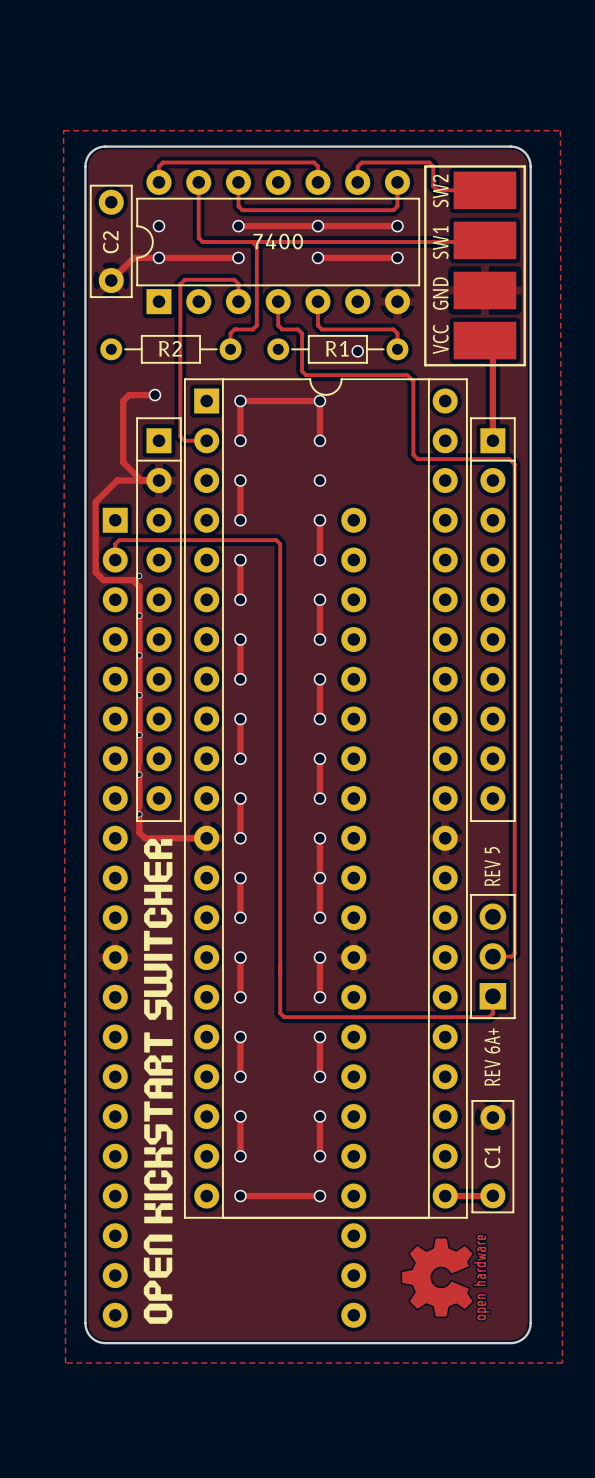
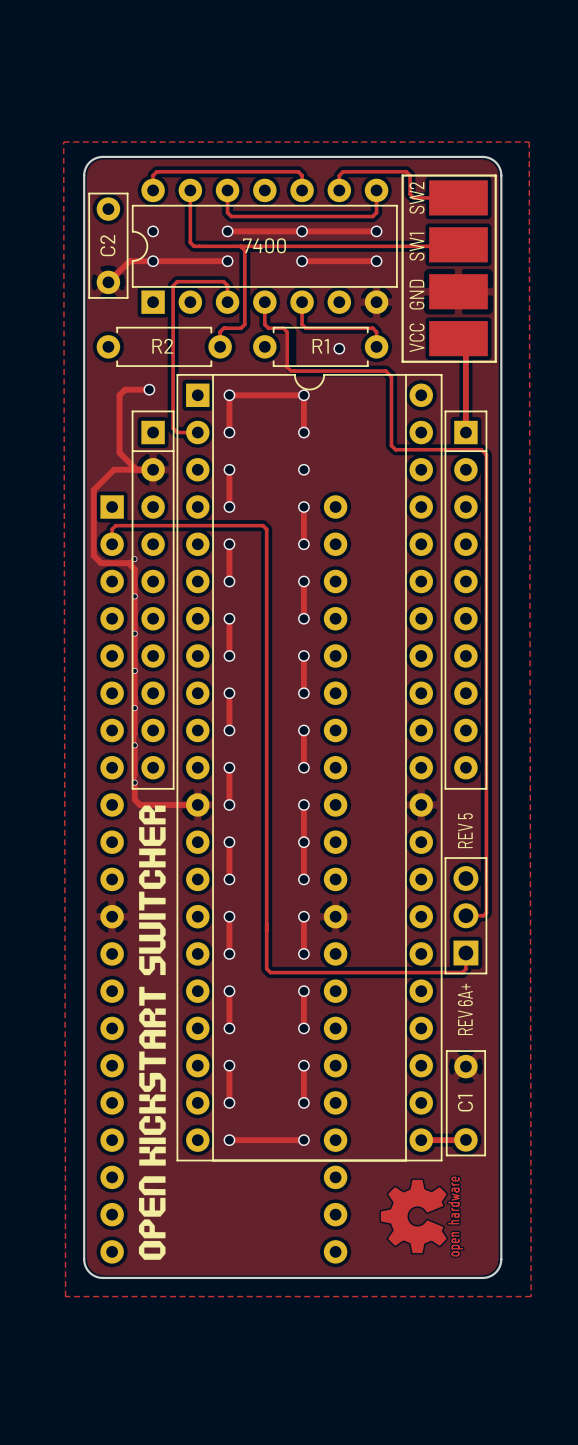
R2 footprint: [100, 334, 242, 364] -> [96, 326, 232, 367]
R1 footprint: [267, 334, 409, 364] -> [253, 326, 389, 367]

